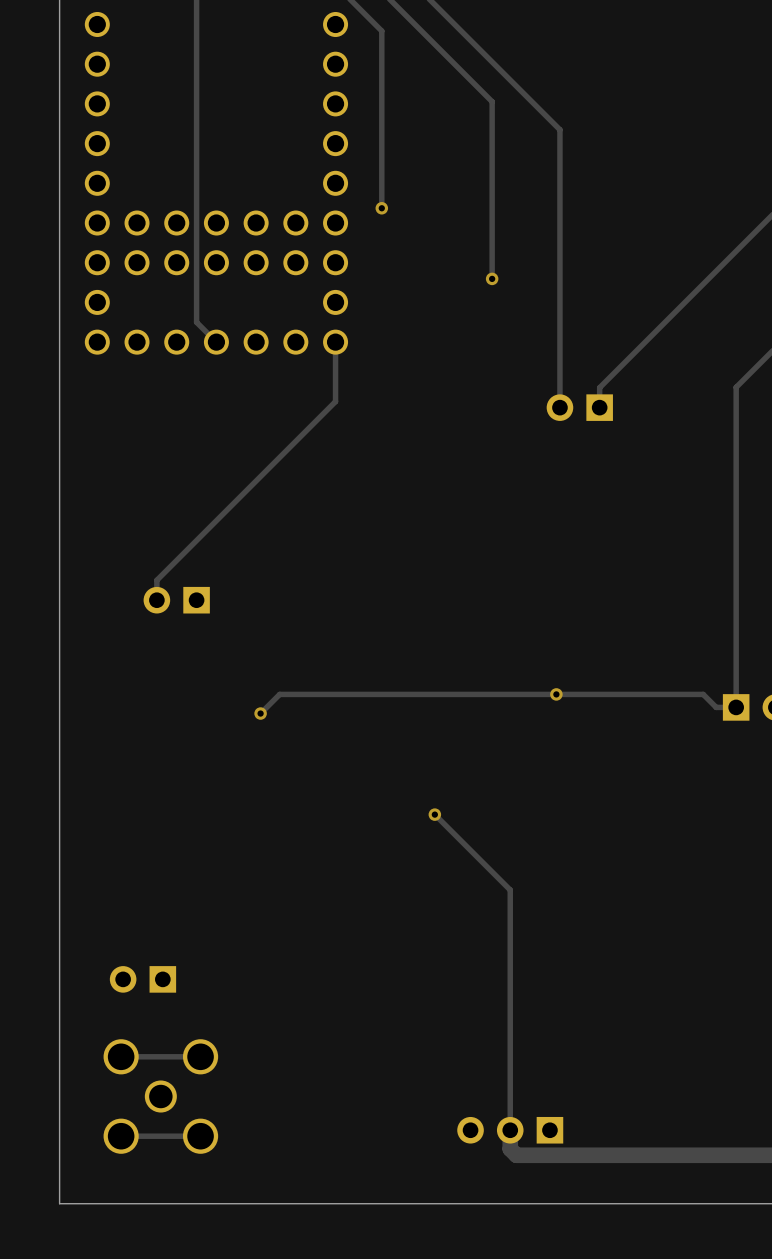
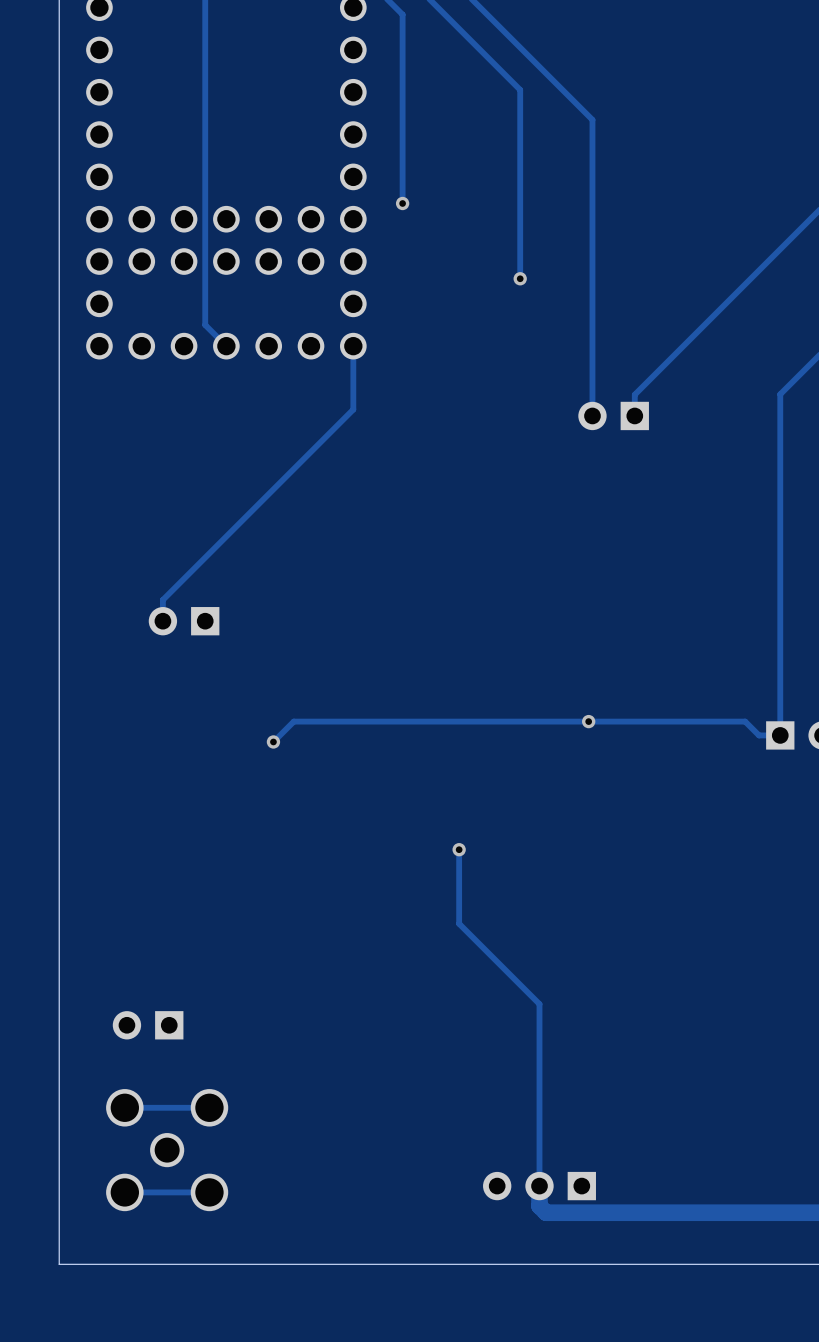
track: (434, 814) (510, 890) (510, 959) -> (459, 849) (459, 923) (539, 1004)

